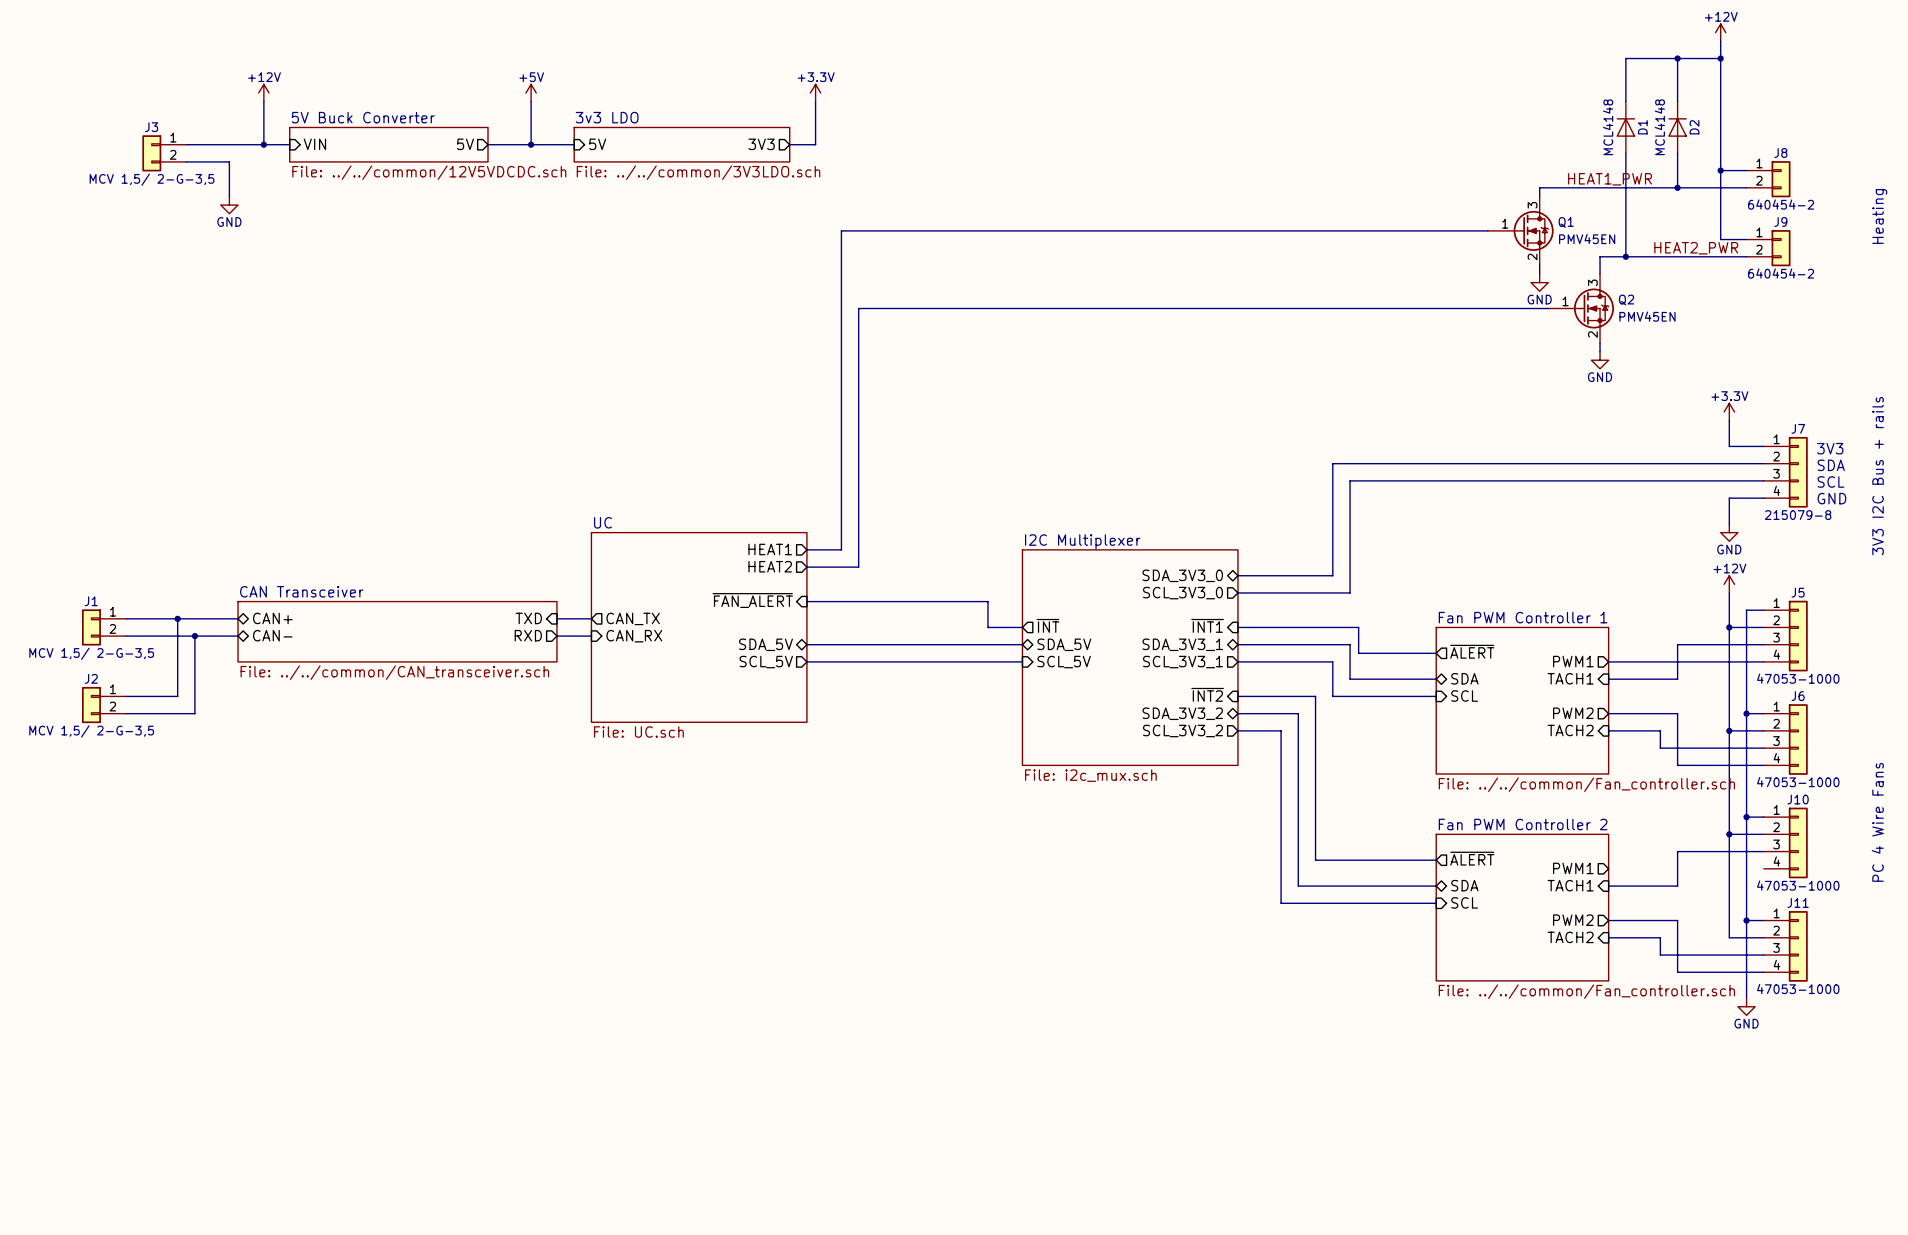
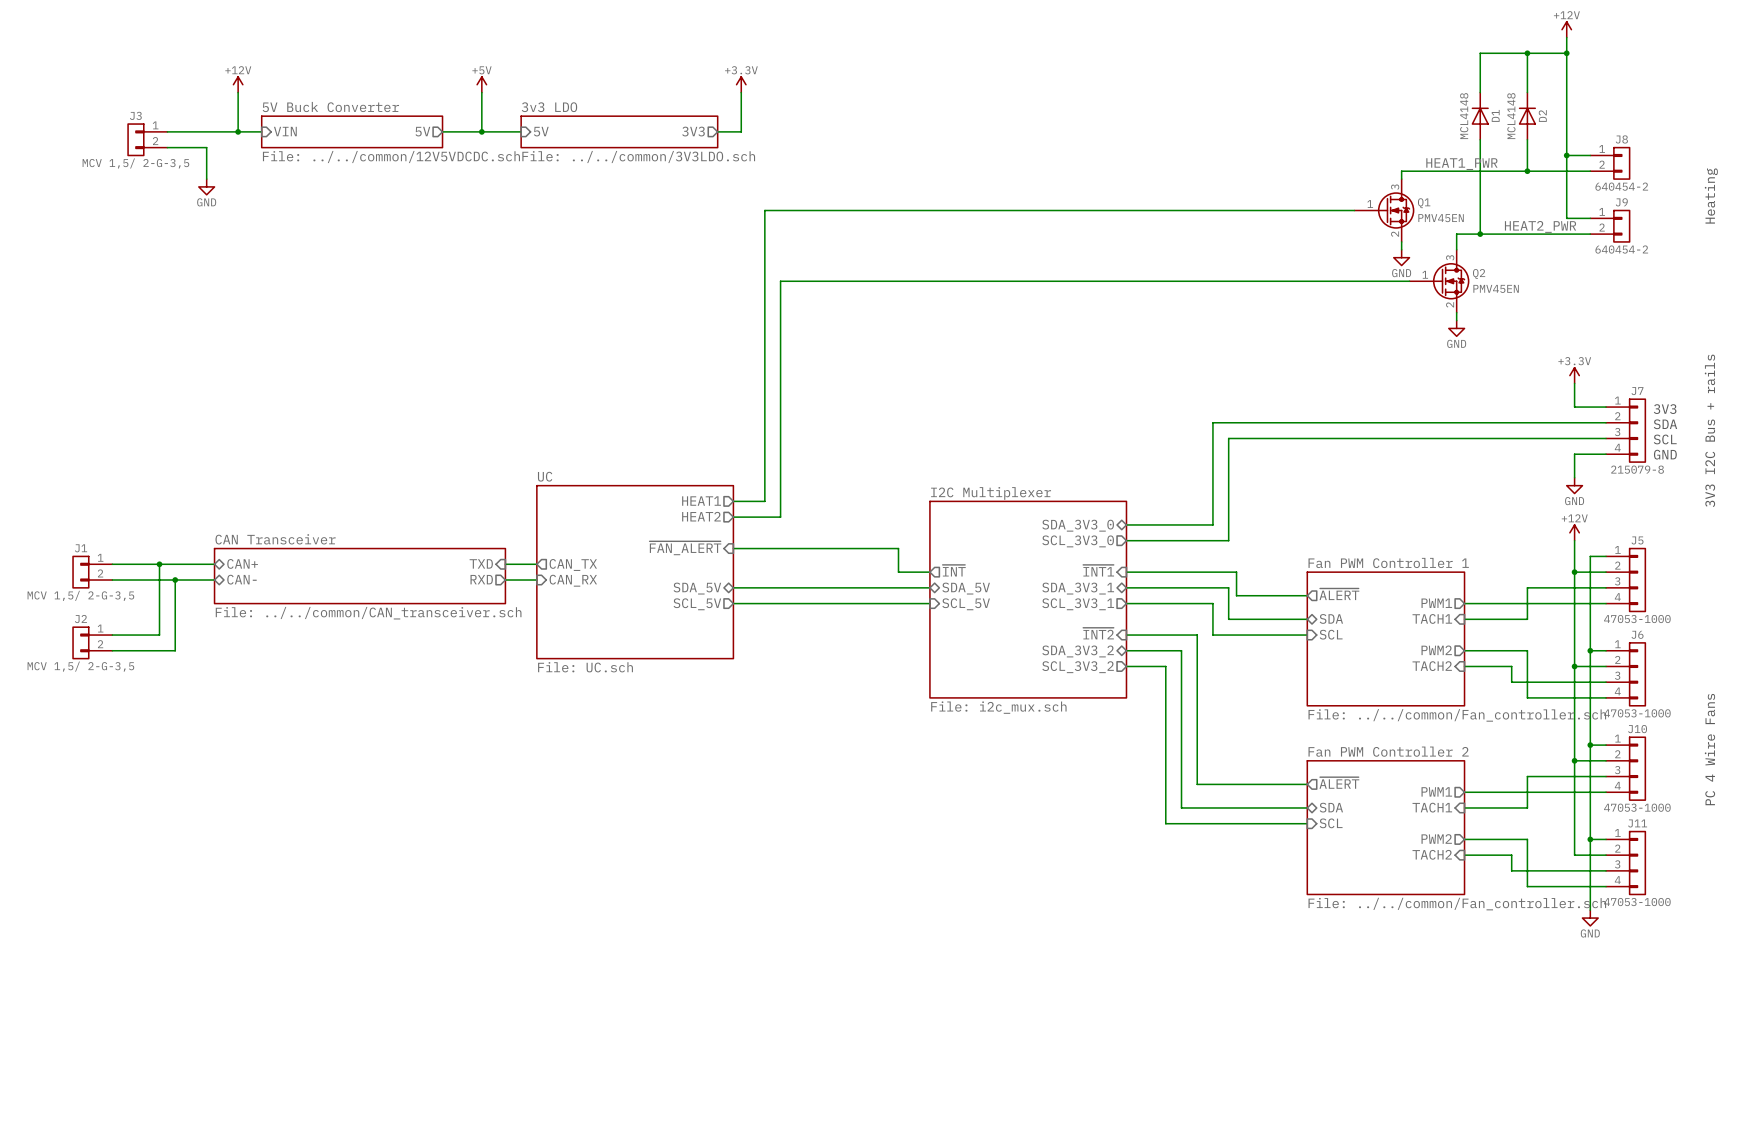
wire: none -> (1464, 792) (1606, 792)

